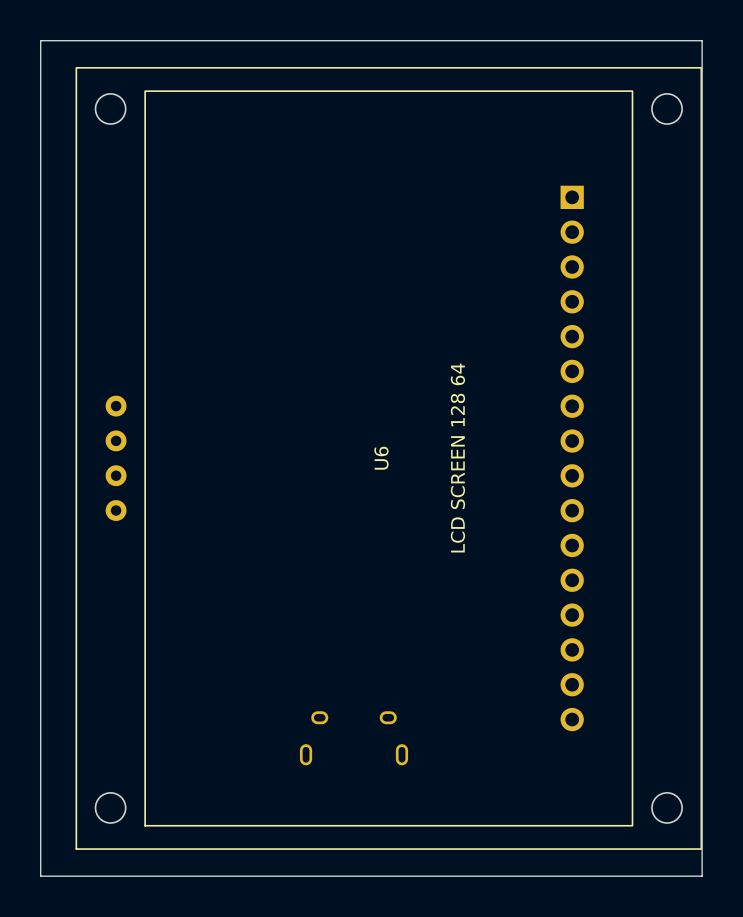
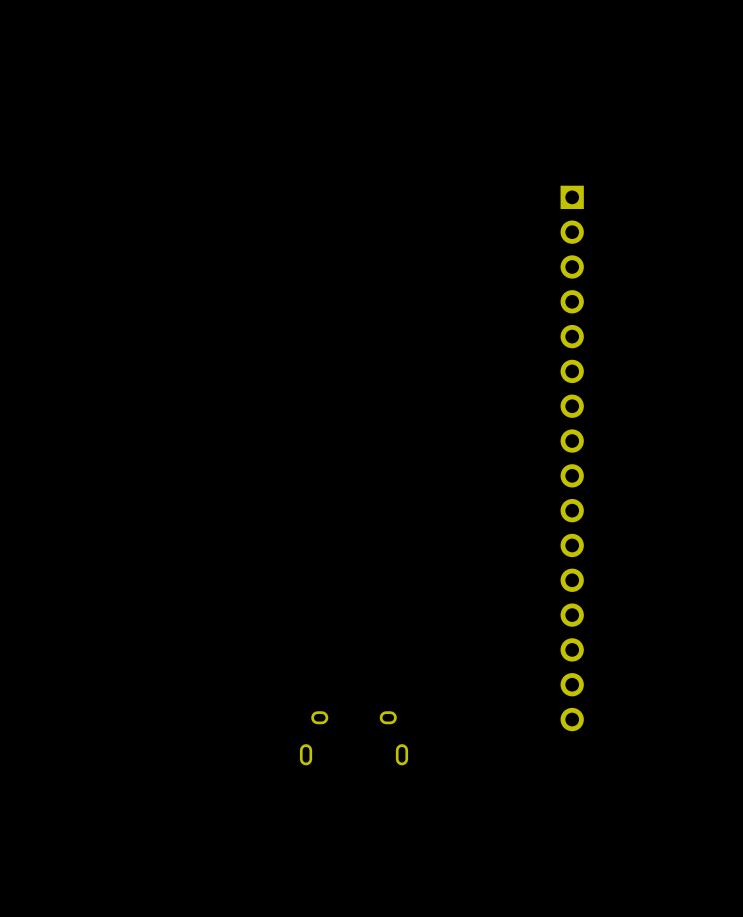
board edge: (702, 40) (40, 40) (40, 876) (702, 876) (702, 40) -> none
U6: (388, 458) -> none

